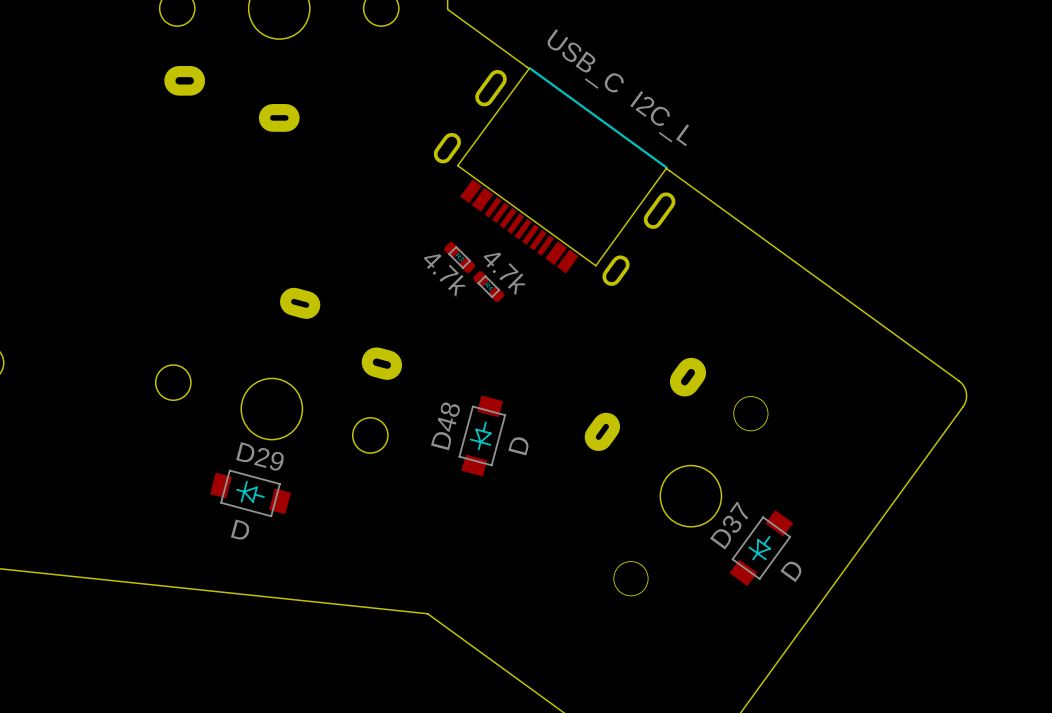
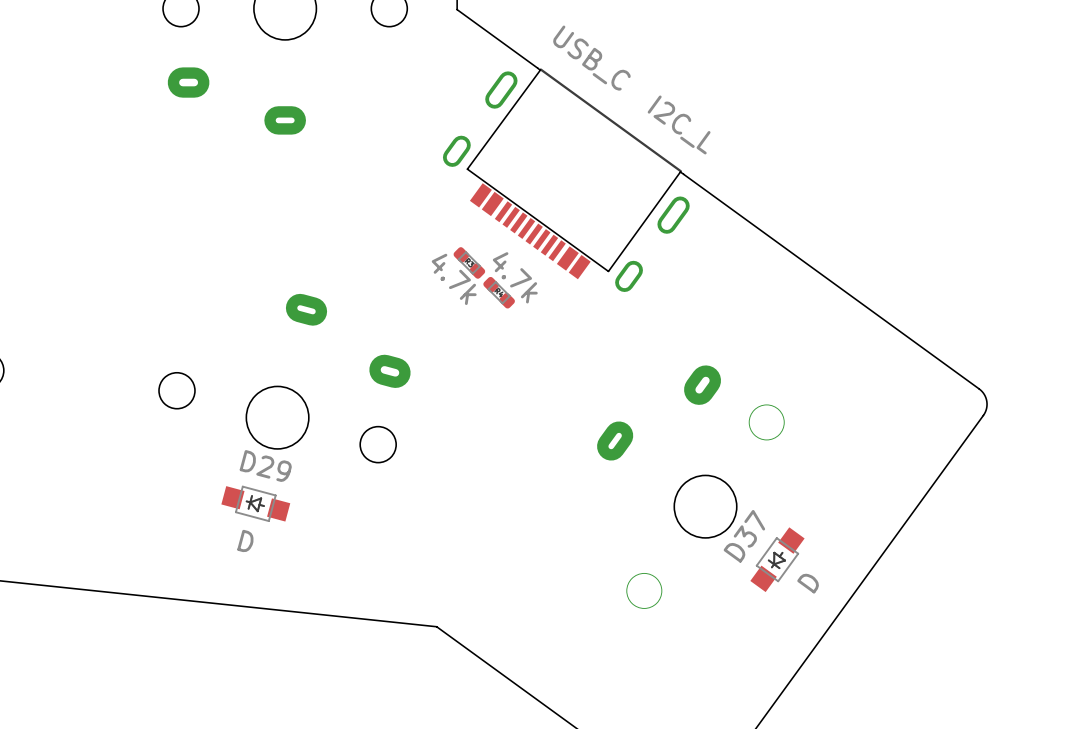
D48: D (482, 435) -> none
D29 footprint: [210, 469, 292, 518] -> [221, 485, 291, 523]
D37 footprint: [729, 510, 794, 587] -> [750, 527, 805, 593]

